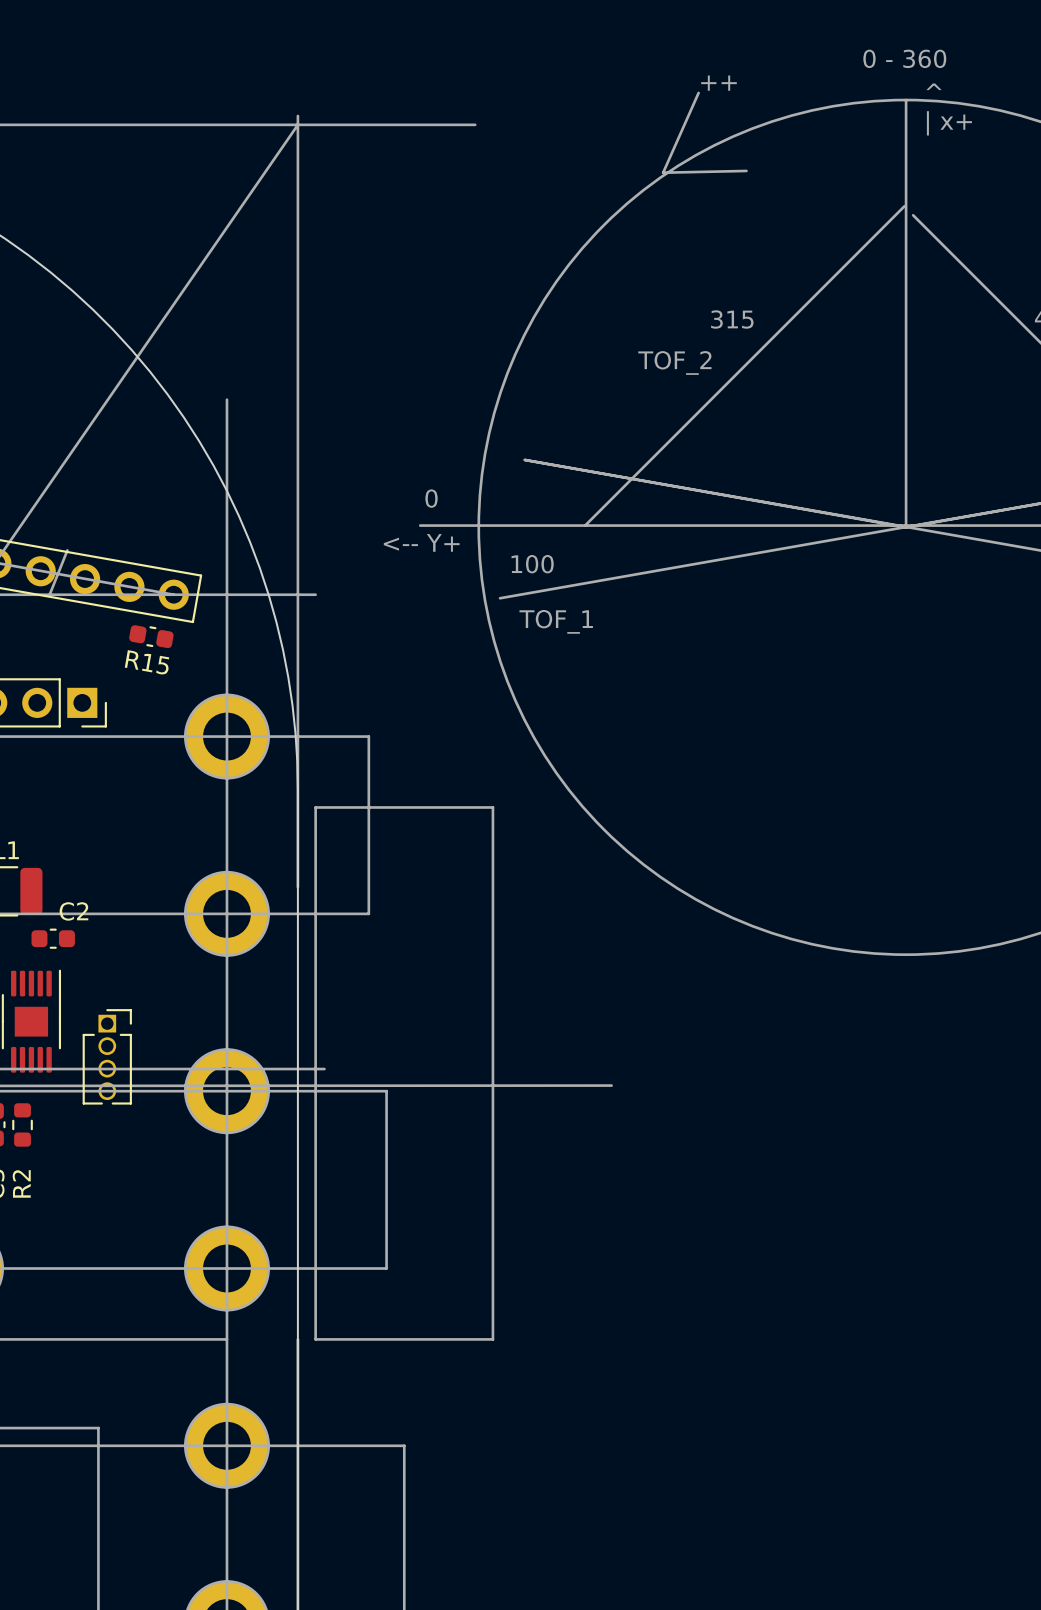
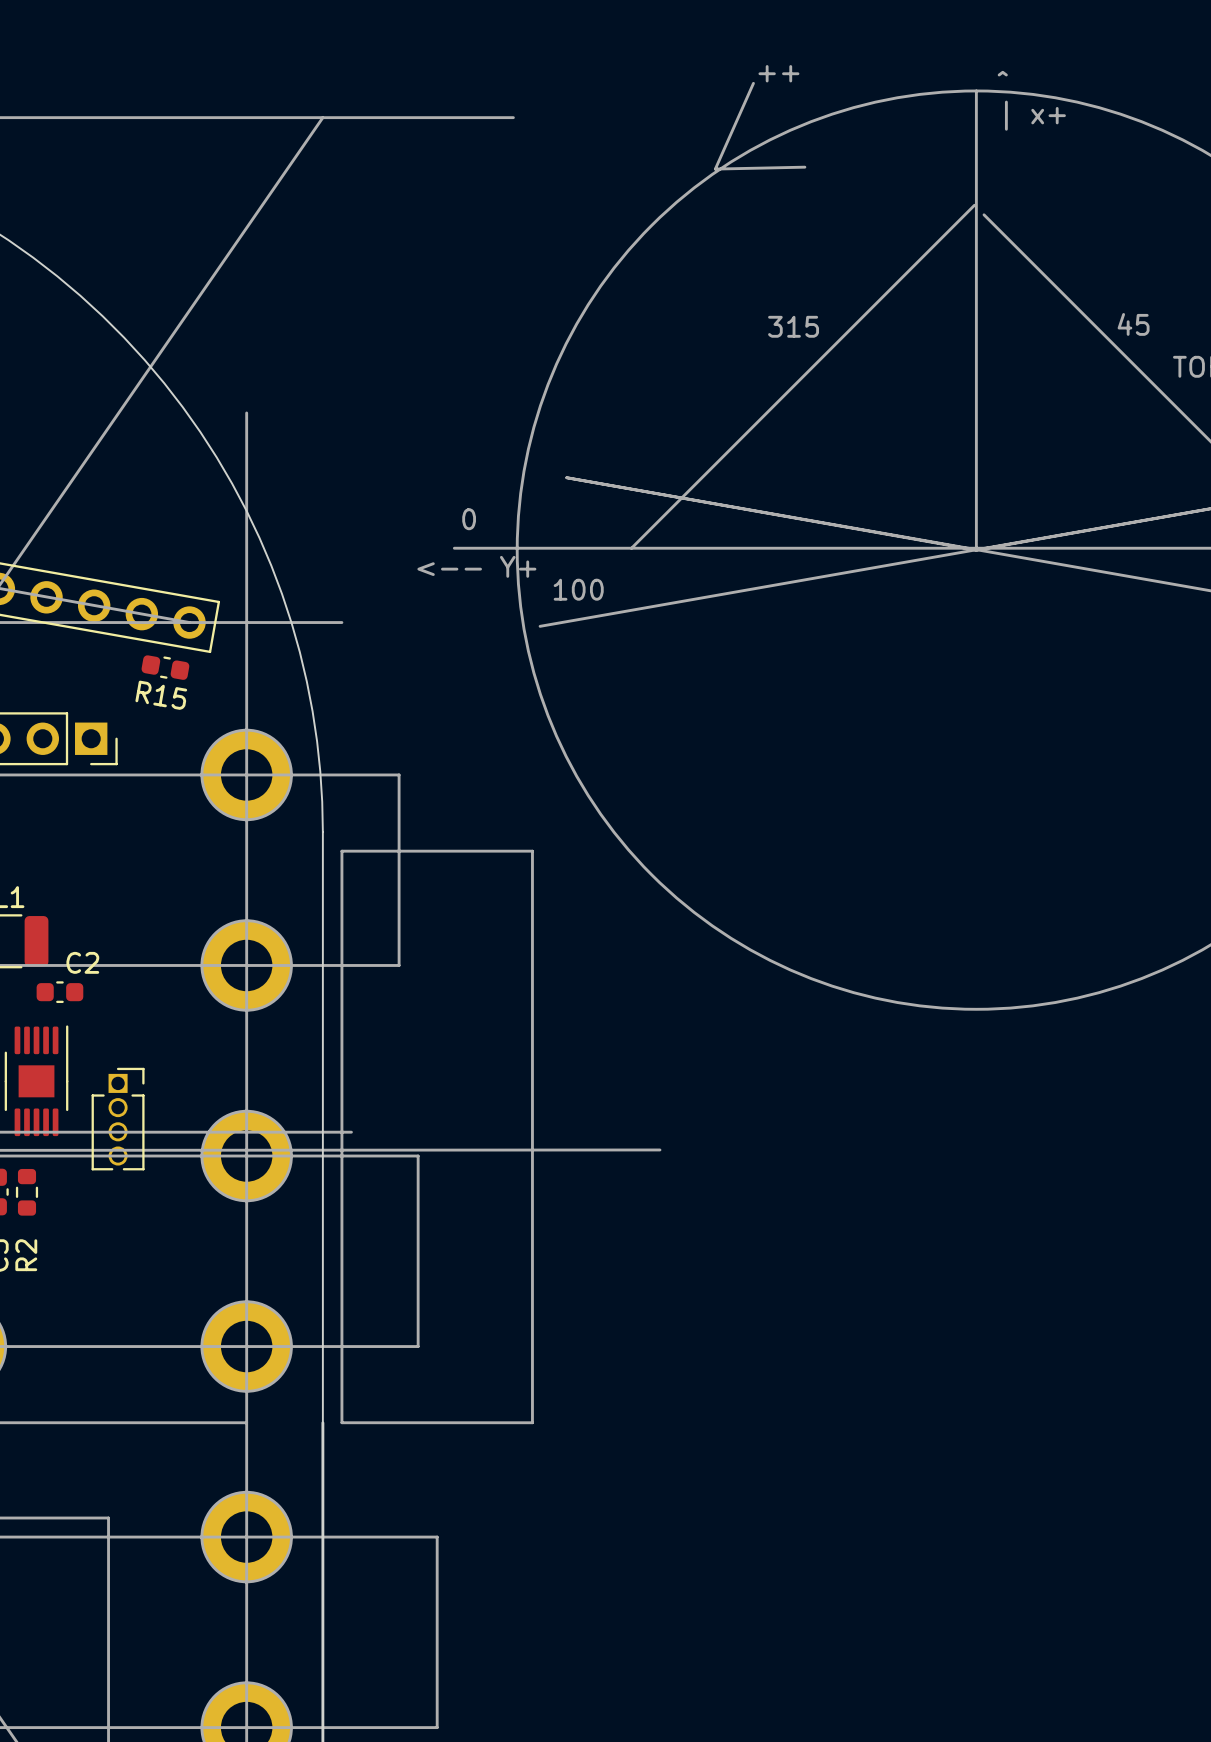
text: 0 - 360 (904, 58) -> none
line: (297, 115) (297, 887) -> none
text: TOF_2 (674, 362) -> none
line: (67, 550) (49, 594) -> none
text: TOF_1 (556, 621) -> none

